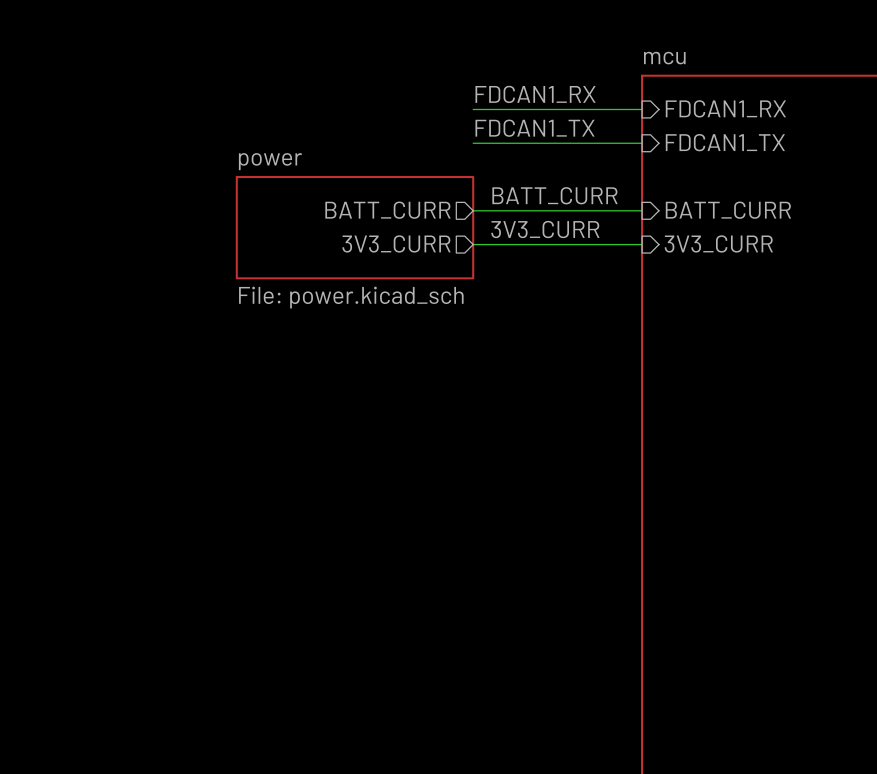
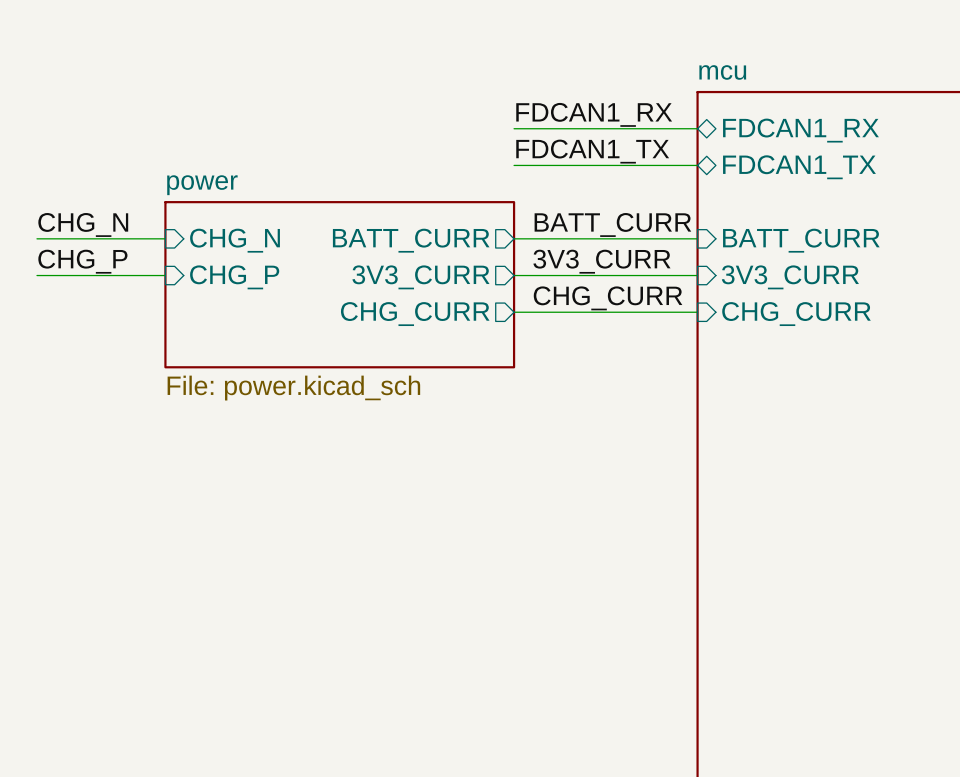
sheet pin shape: input (725, 108) -> bidirectional (800, 130)
sheet pin shape: input (725, 142) -> bidirectional (799, 167)
label: none -> CHG_N (83, 224)
wire: none -> (36, 238) (165, 238)
sheet pin: none -> CHG_N (235, 240)
sheet power: File: power.kicad_sch (355, 227) -> none
label: none -> CHG_P (82, 261)
sheet pin: none -> CHG_P (234, 277)
wire: none -> (36, 275) (165, 275)
sheet power: none -> File: power.kicad_sch (339, 284)
label: none -> CHG_CURR (608, 298)
sheet pin: none -> CHG_CURR (415, 314)
sheet pin: none -> CHG_CURR (796, 314)
wire: none -> (514, 312) (697, 312)

